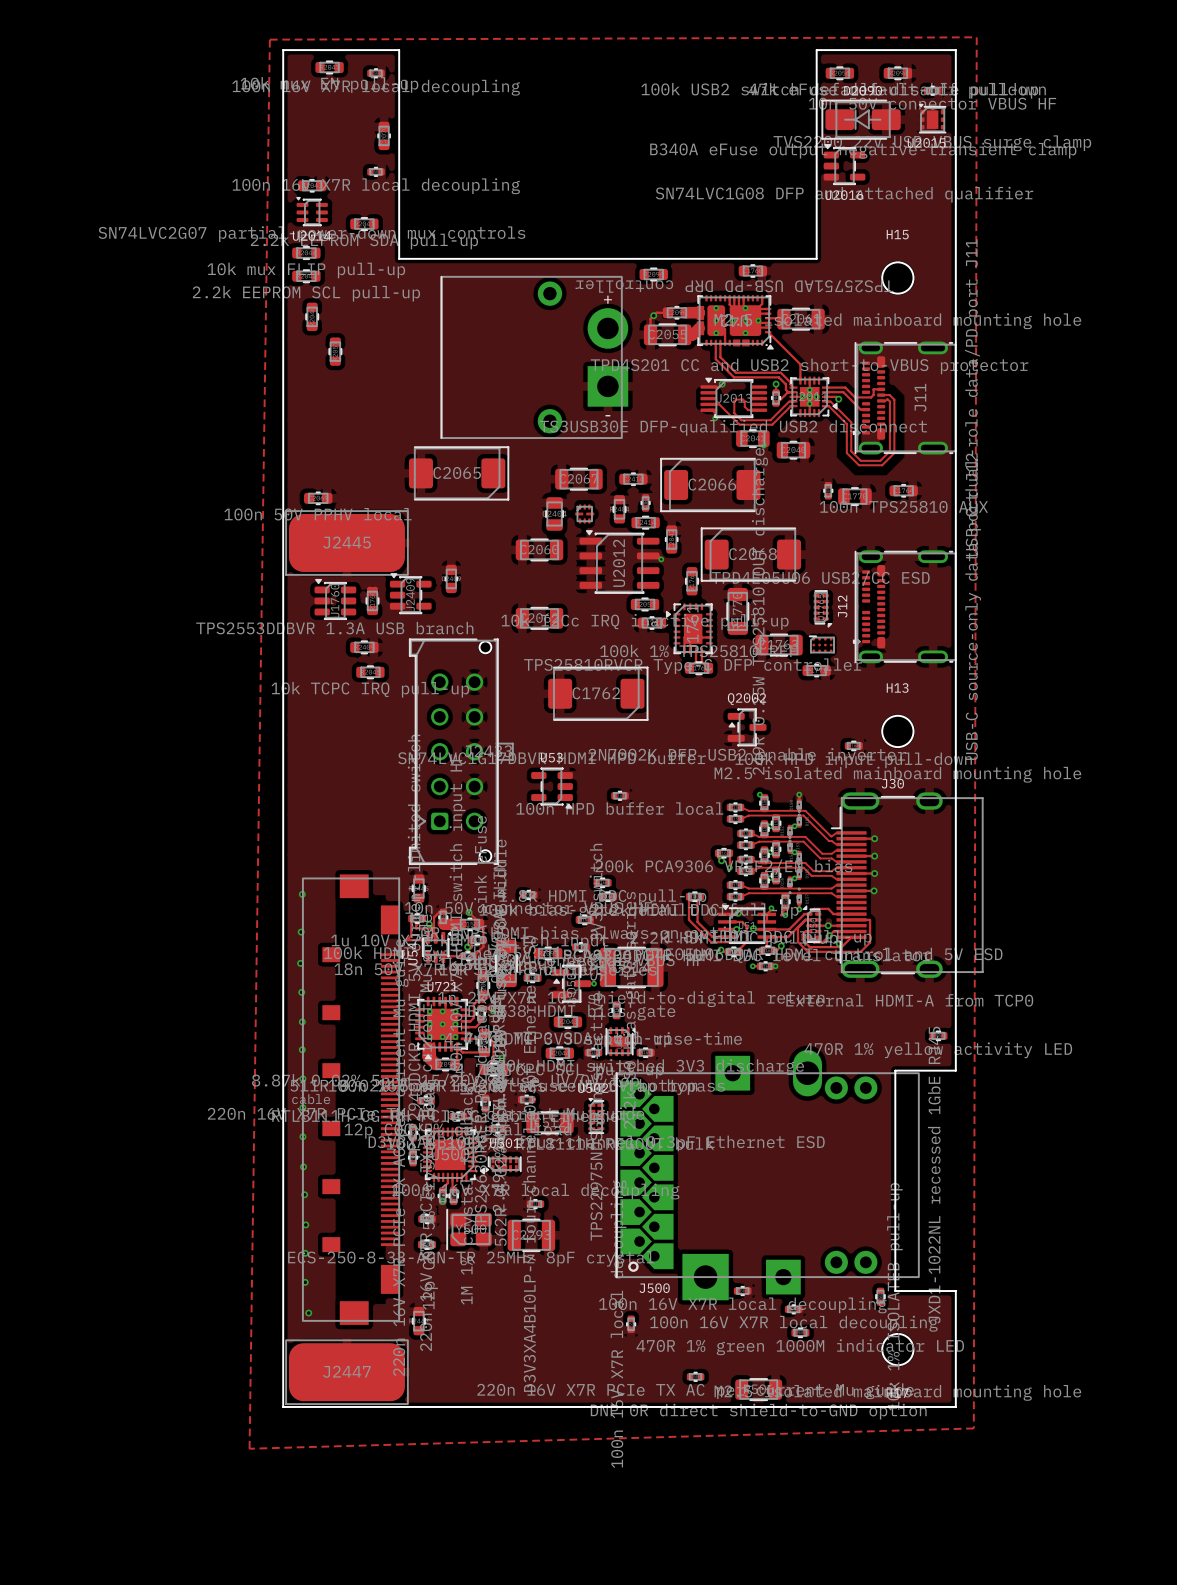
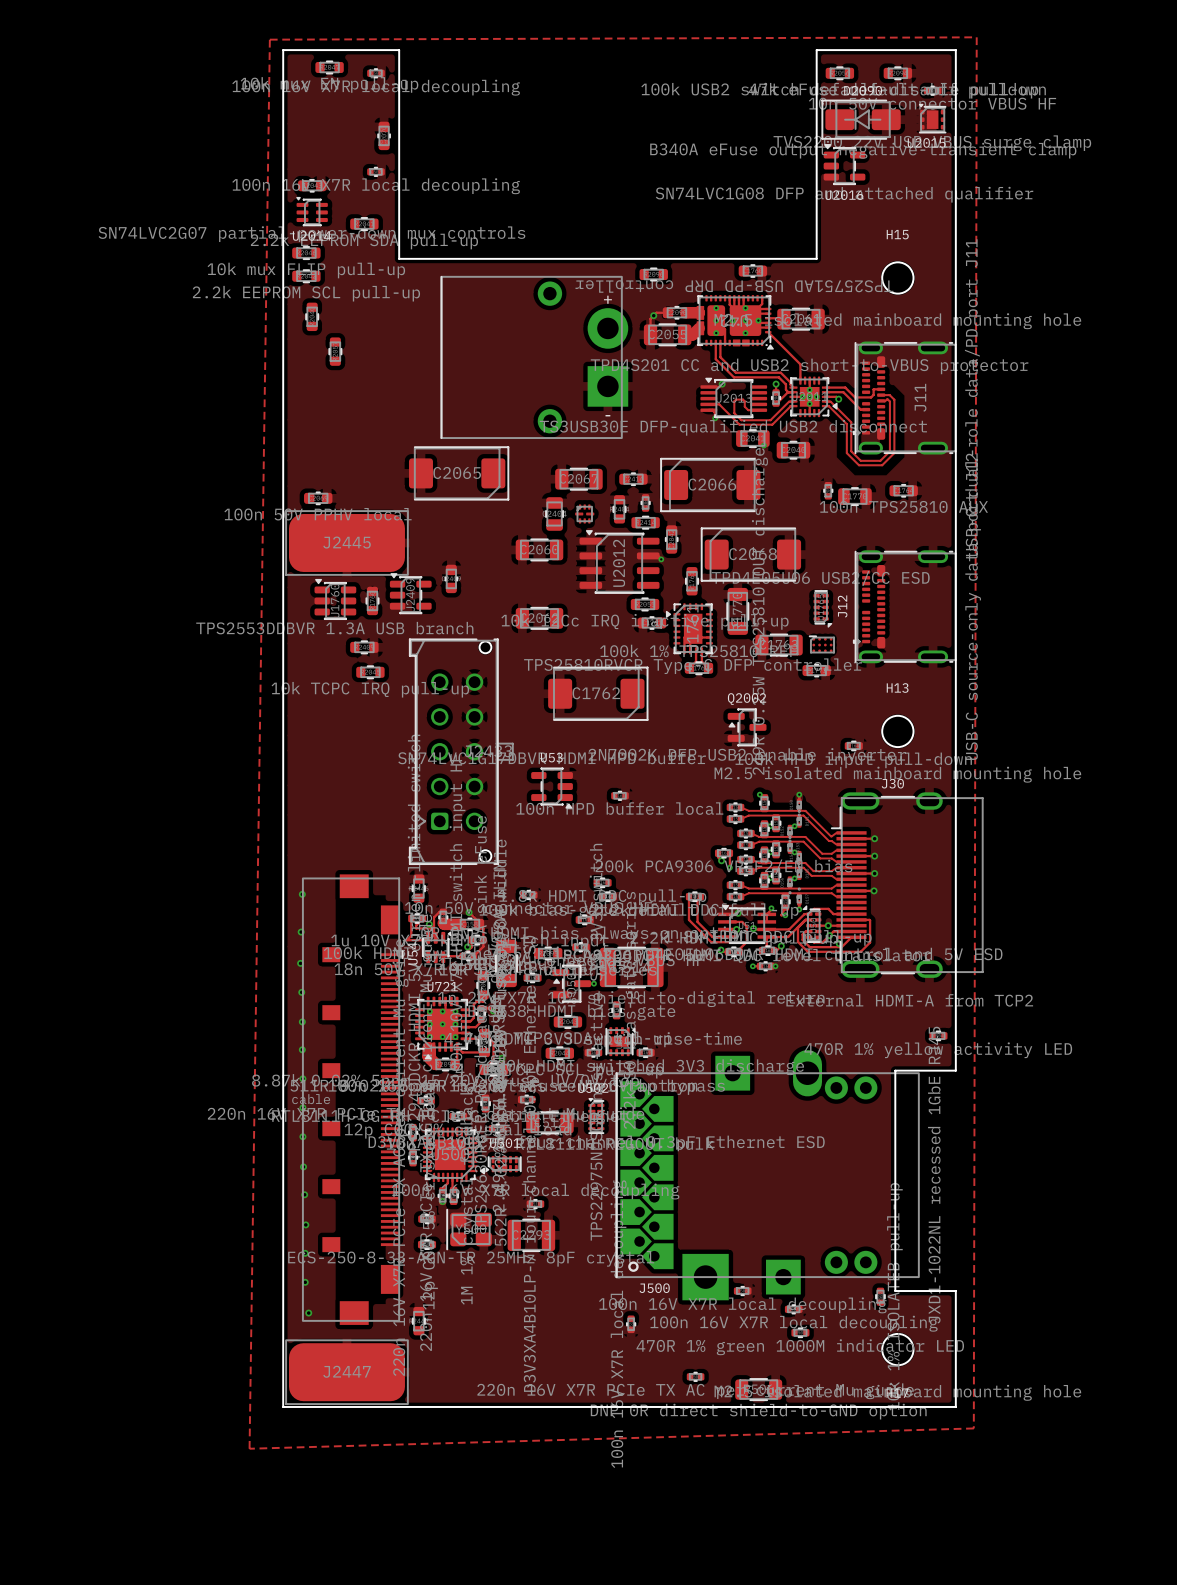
J30 value: External HDMI-A from TCP0 (909, 1000) -> External HDMI-A from TCP2 (909, 1000)

